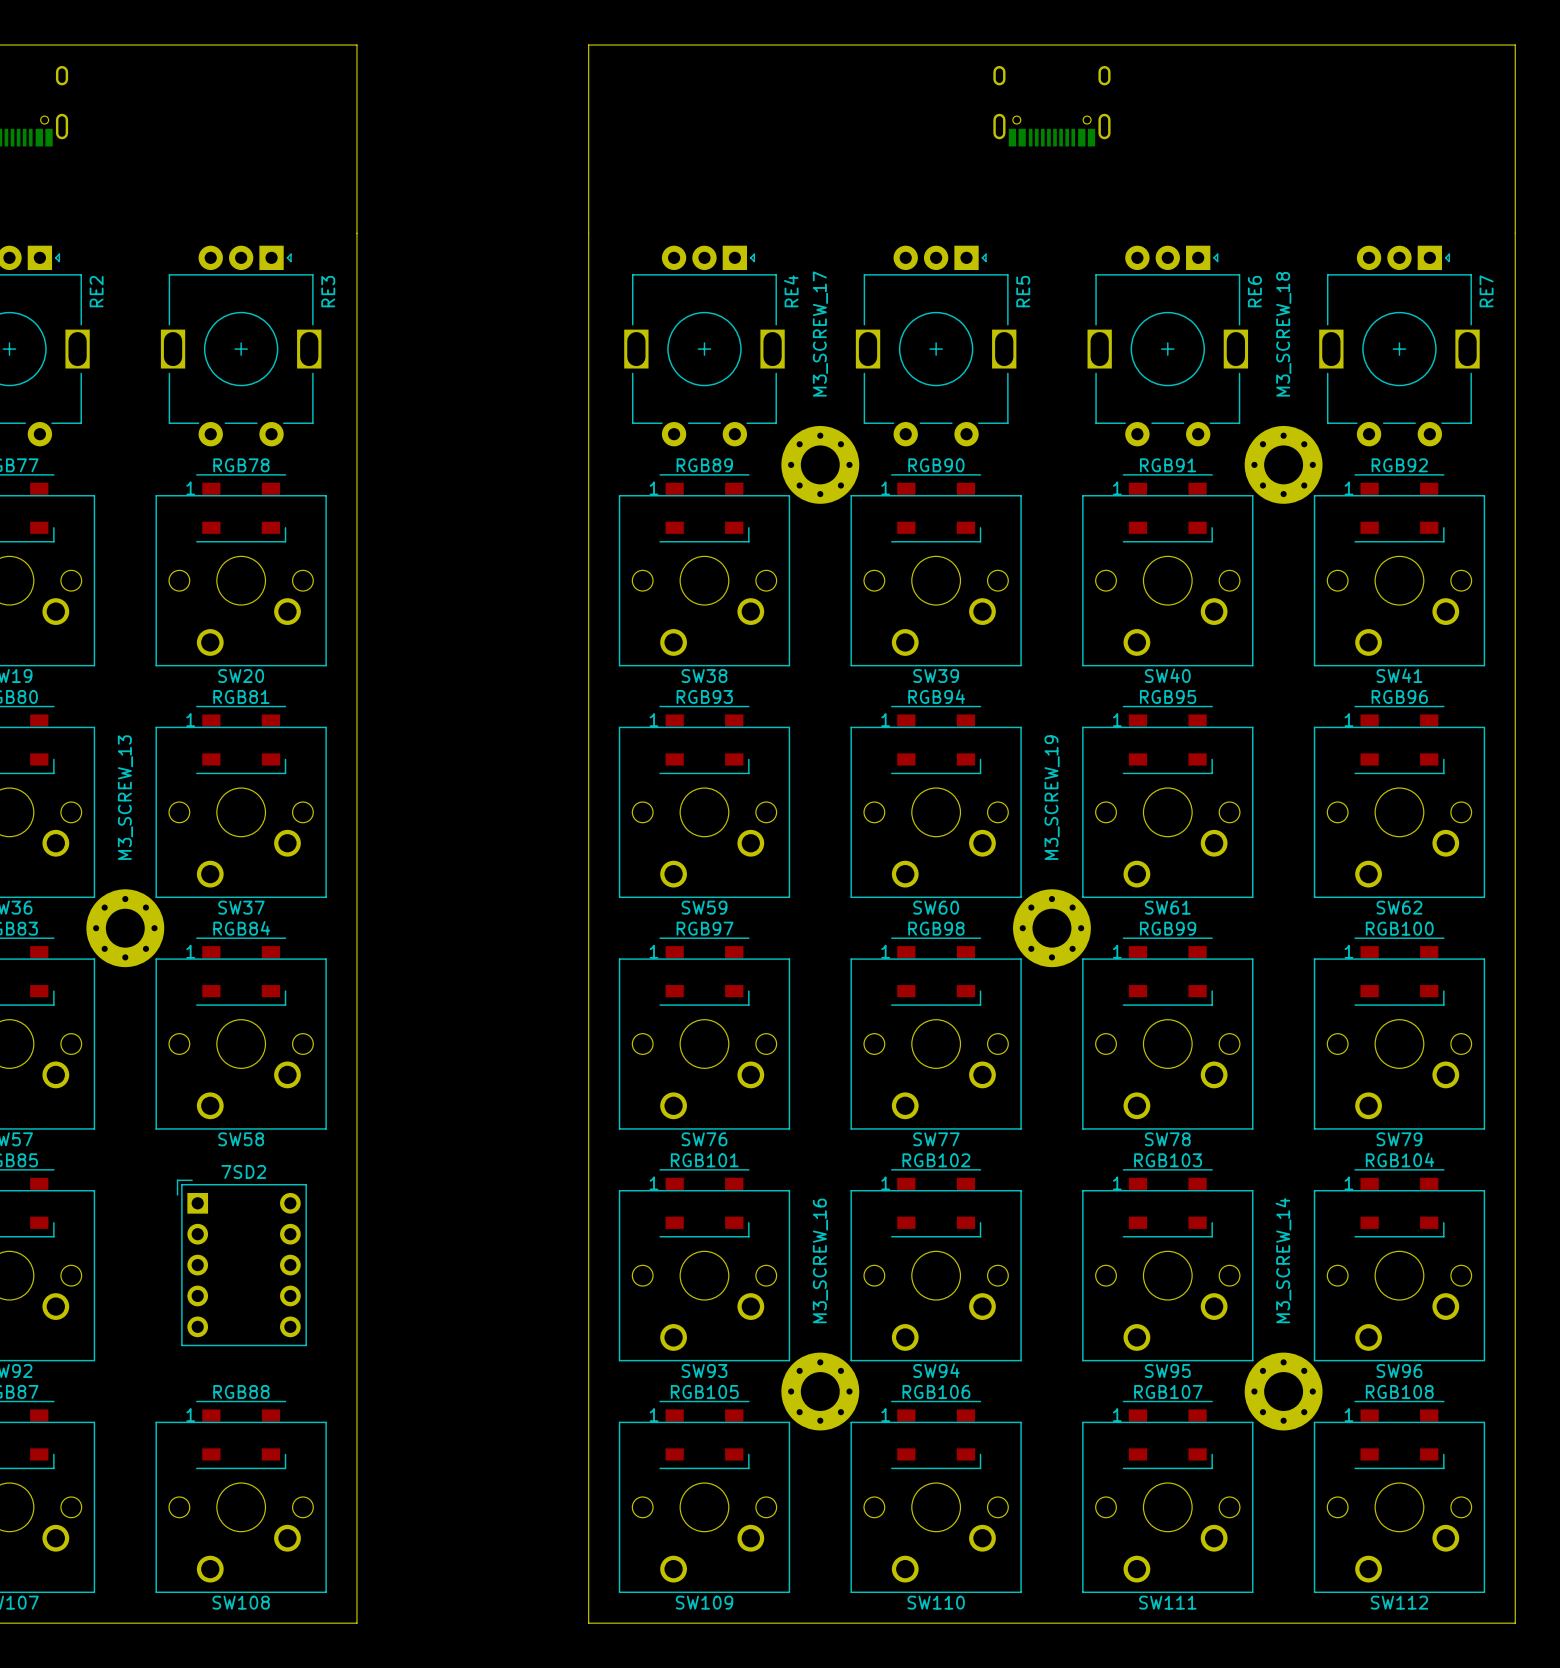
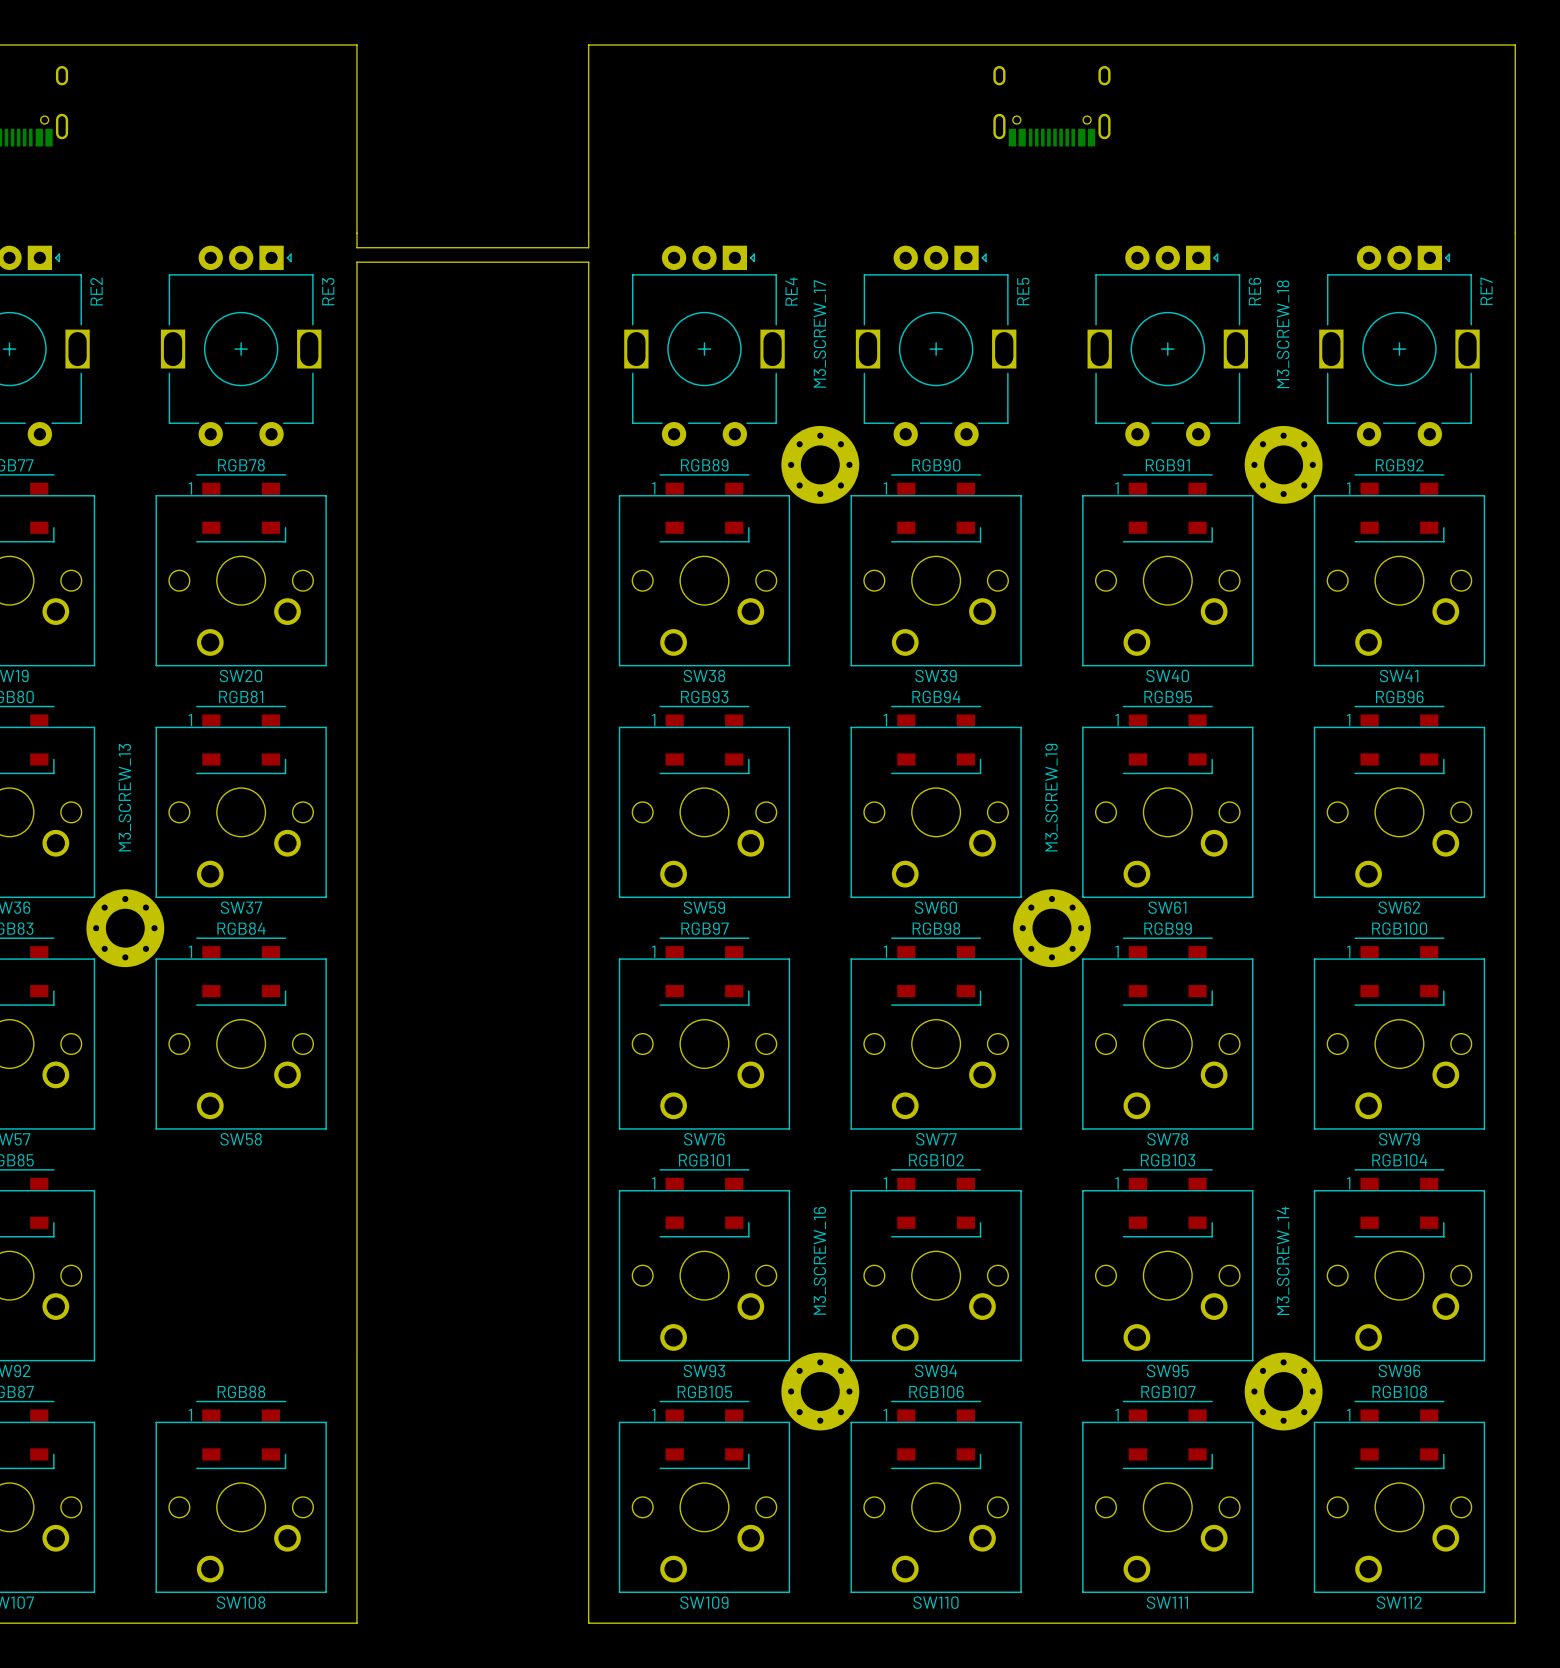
board edge: (356, 247) (356, 262) -> (356, 247) (588, 247)
board edge: (588, 247) (588, 262) -> (356, 262) (588, 262)
7SD2: (241, 1262) -> none

